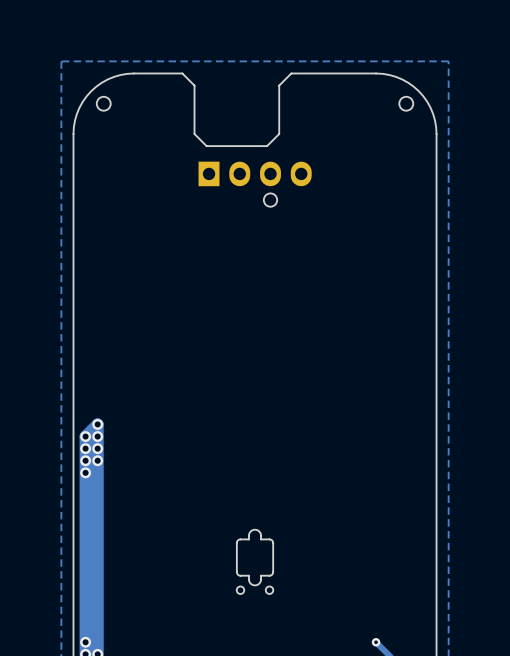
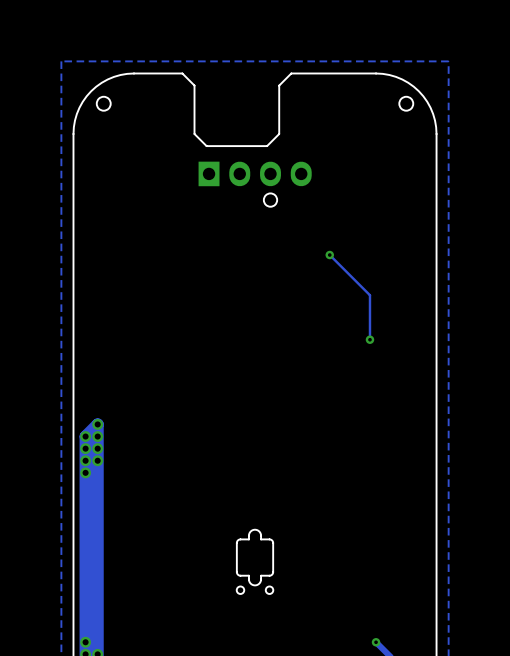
track: none -> (329, 255) (369, 295) (369, 339)
via: none -> (329, 255)
via: none -> (369, 339)

